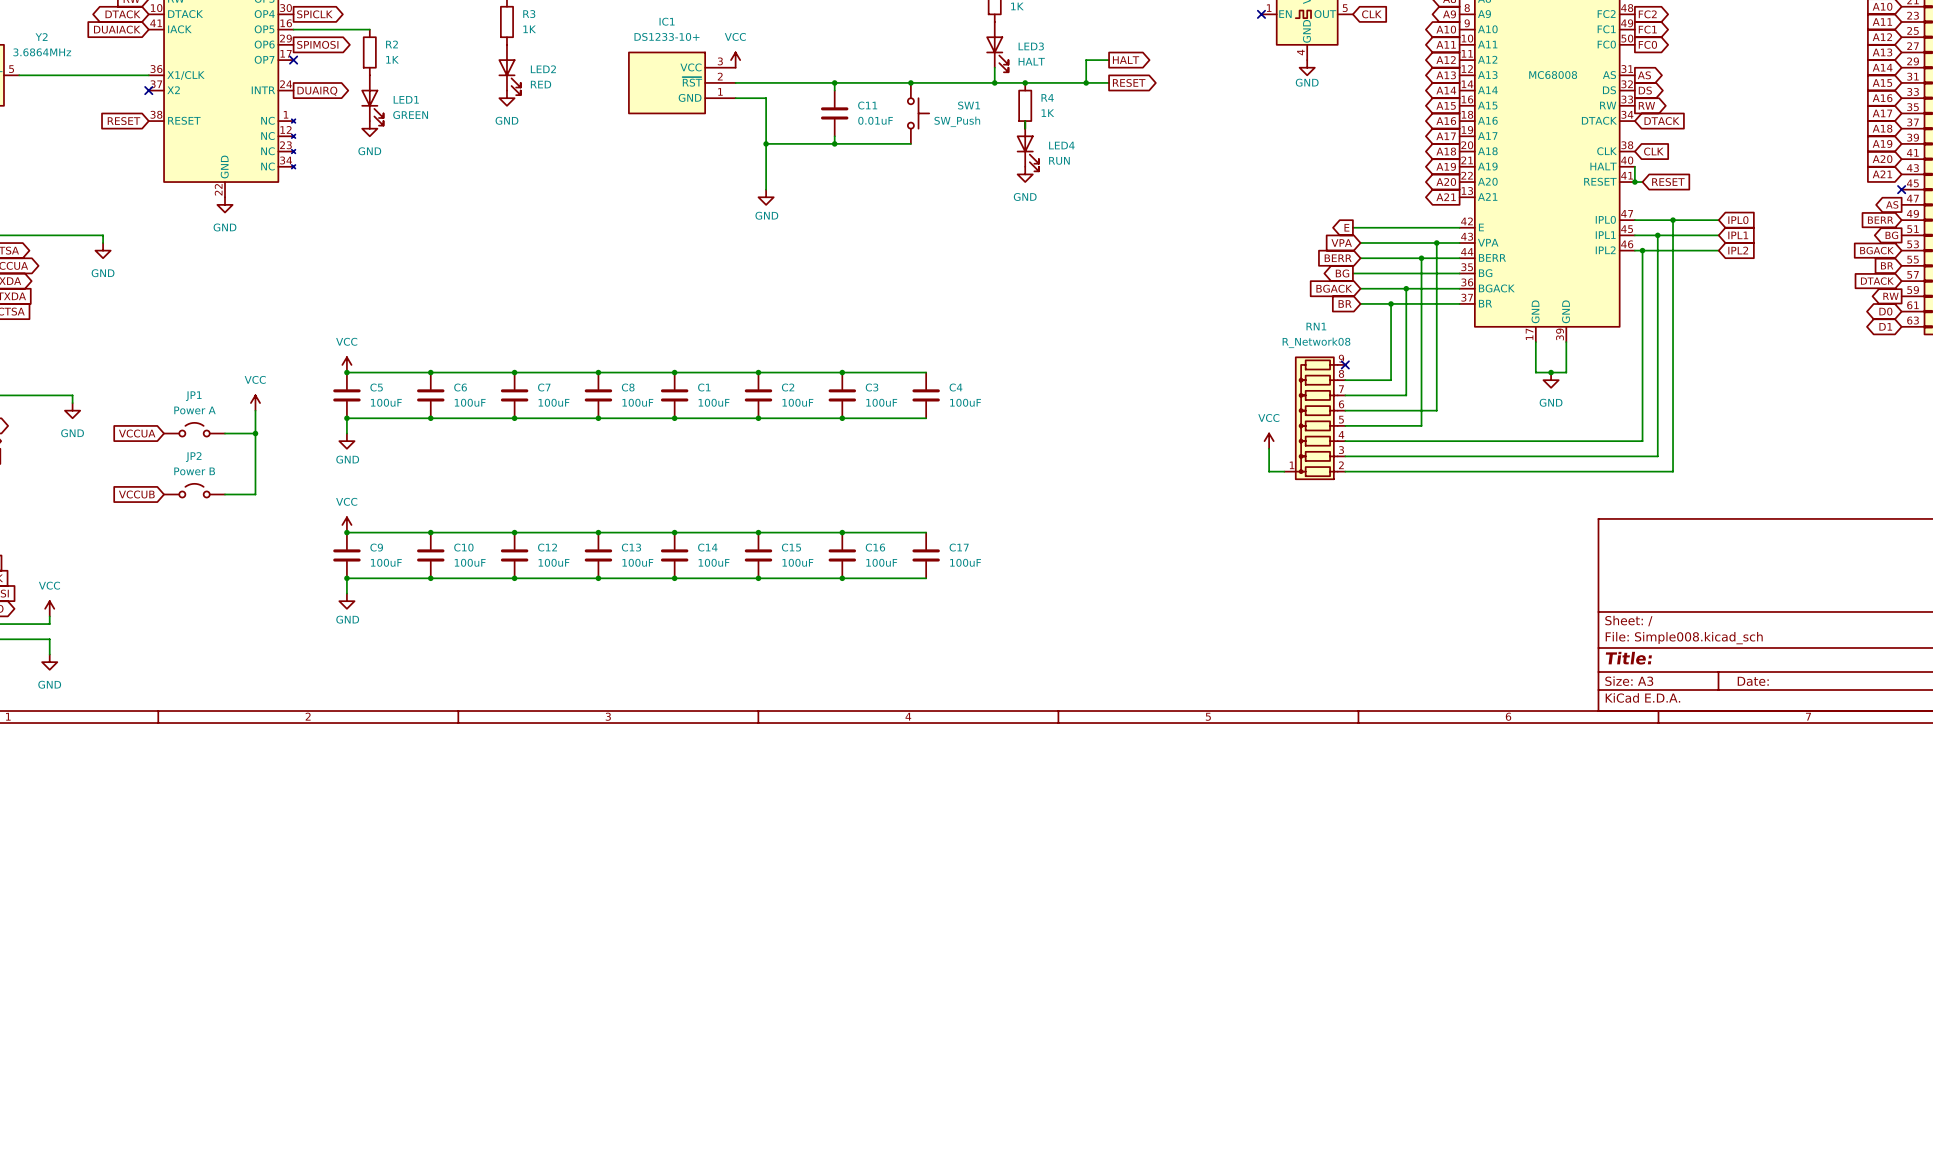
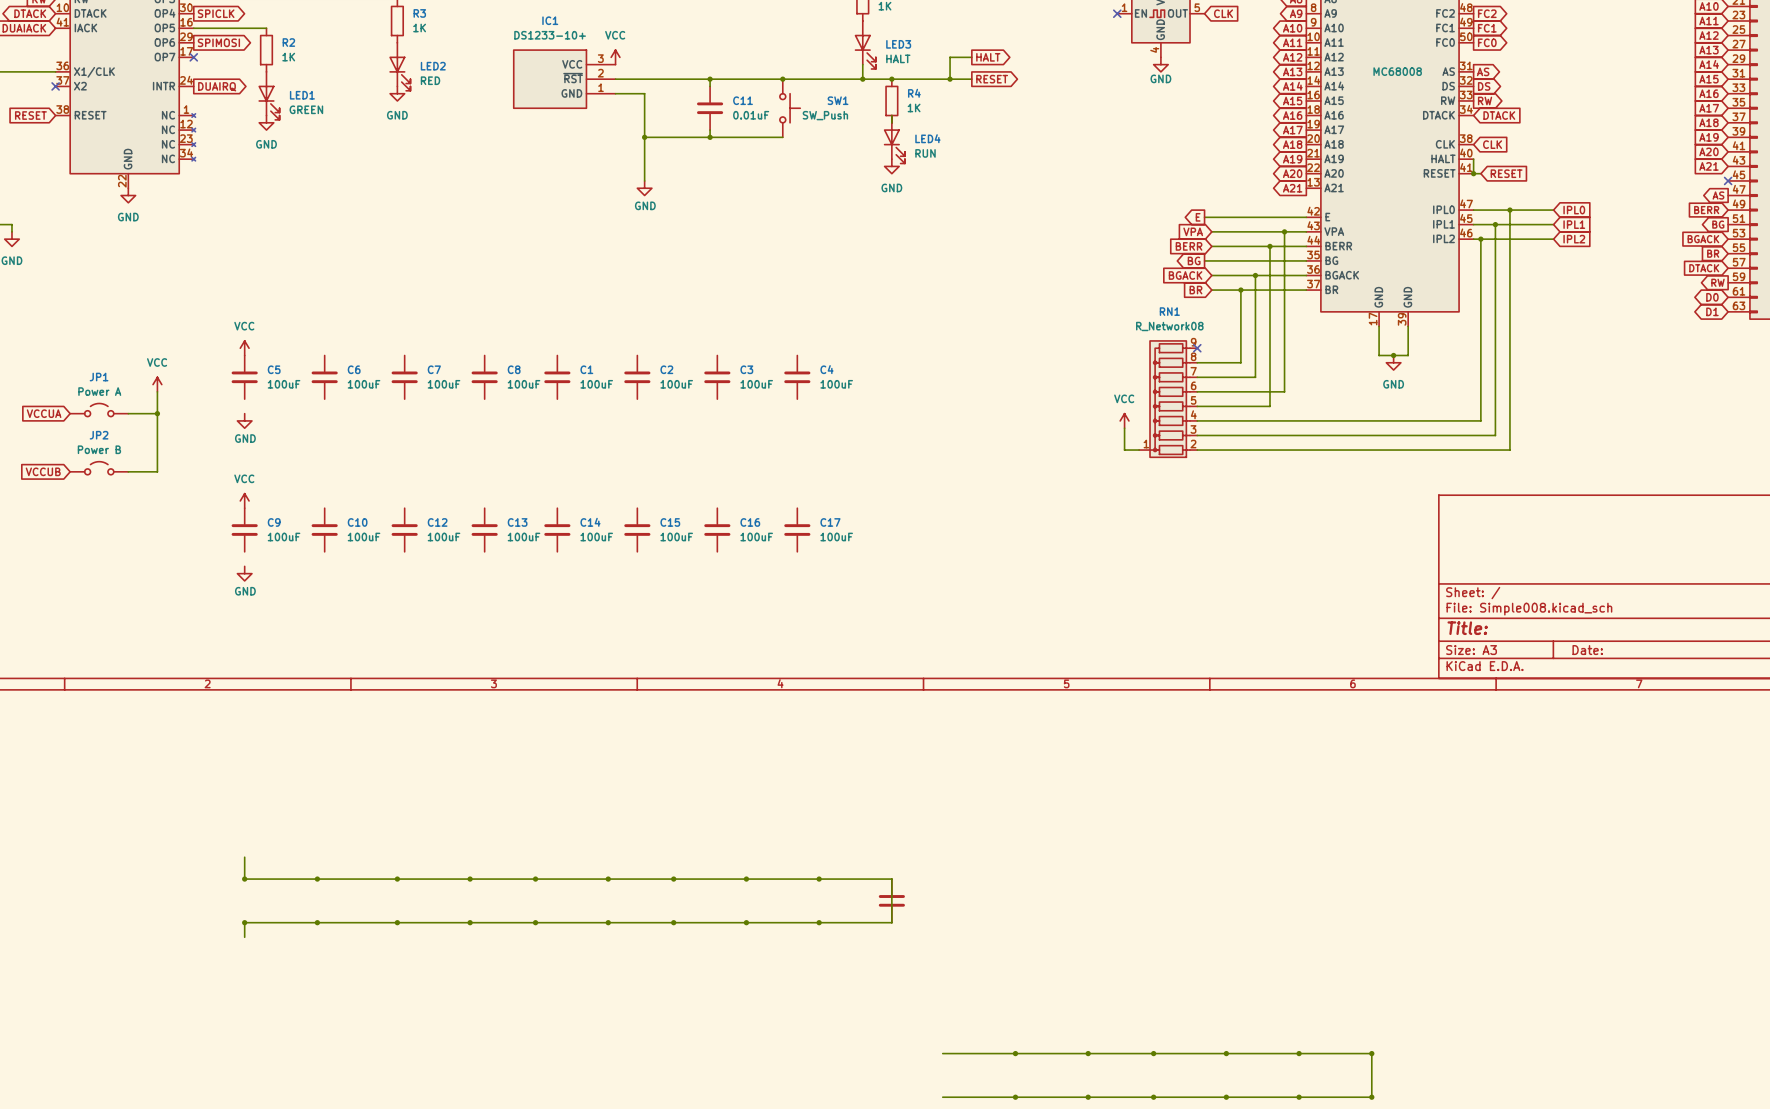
wire: (346, 372) (926, 372) -> none
junction: (346, 372) -> none
junction: (430, 372) -> none
junction: (514, 372) -> none
junction: (598, 372) -> none
junction: (674, 372) -> none
junction: (758, 372) -> none
junction: (842, 372) -> none
junction: (346, 418) -> none
junction: (430, 418) -> none
junction: (514, 418) -> none
junction: (598, 418) -> none
junction: (674, 418) -> none
junction: (758, 418) -> none
junction: (842, 418) -> none
wire: (926, 418) (346, 418) (346, 433) -> none
wire: (346, 532) (926, 532) -> none
junction: (346, 532) -> none
junction: (430, 532) -> none
junction: (514, 532) -> none
junction: (598, 532) -> none
junction: (674, 532) -> none
junction: (758, 532) -> none
junction: (842, 532) -> none
junction: (346, 578) -> none
junction: (430, 578) -> none
junction: (514, 578) -> none
junction: (598, 578) -> none
junction: (674, 578) -> none
junction: (758, 578) -> none
junction: (842, 578) -> none
wire: (926, 578) (346, 578) (346, 593) -> none
wire: none -> (244, 857) (244, 879) (891, 879) (891, 922) (244, 922) (244, 937)
junction: none -> (244, 879)
junction: none -> (317, 879)
junction: none -> (397, 879)
junction: none -> (470, 879)
junction: none -> (535, 879)
junction: none -> (608, 879)
junction: none -> (673, 879)
junction: none -> (746, 879)
junction: none -> (819, 879)
part: none -> (891, 900)
junction: none -> (244, 922)
junction: none -> (317, 922)
junction: none -> (397, 922)
junction: none -> (470, 922)
junction: none -> (535, 922)
junction: none -> (608, 922)
junction: none -> (673, 922)
junction: none -> (746, 922)
junction: none -> (819, 922)
wire: none -> (942, 1053) (1371, 1053) (1371, 1097) (942, 1097)
junction: none -> (1015, 1053)
junction: none -> (1088, 1053)
junction: none -> (1153, 1053)
junction: none -> (1226, 1053)
junction: none -> (1299, 1053)
junction: none -> (1371, 1053)
junction: none -> (1015, 1097)
junction: none -> (1088, 1097)
junction: none -> (1153, 1097)
junction: none -> (1226, 1097)
junction: none -> (1299, 1097)
junction: none -> (1371, 1097)

